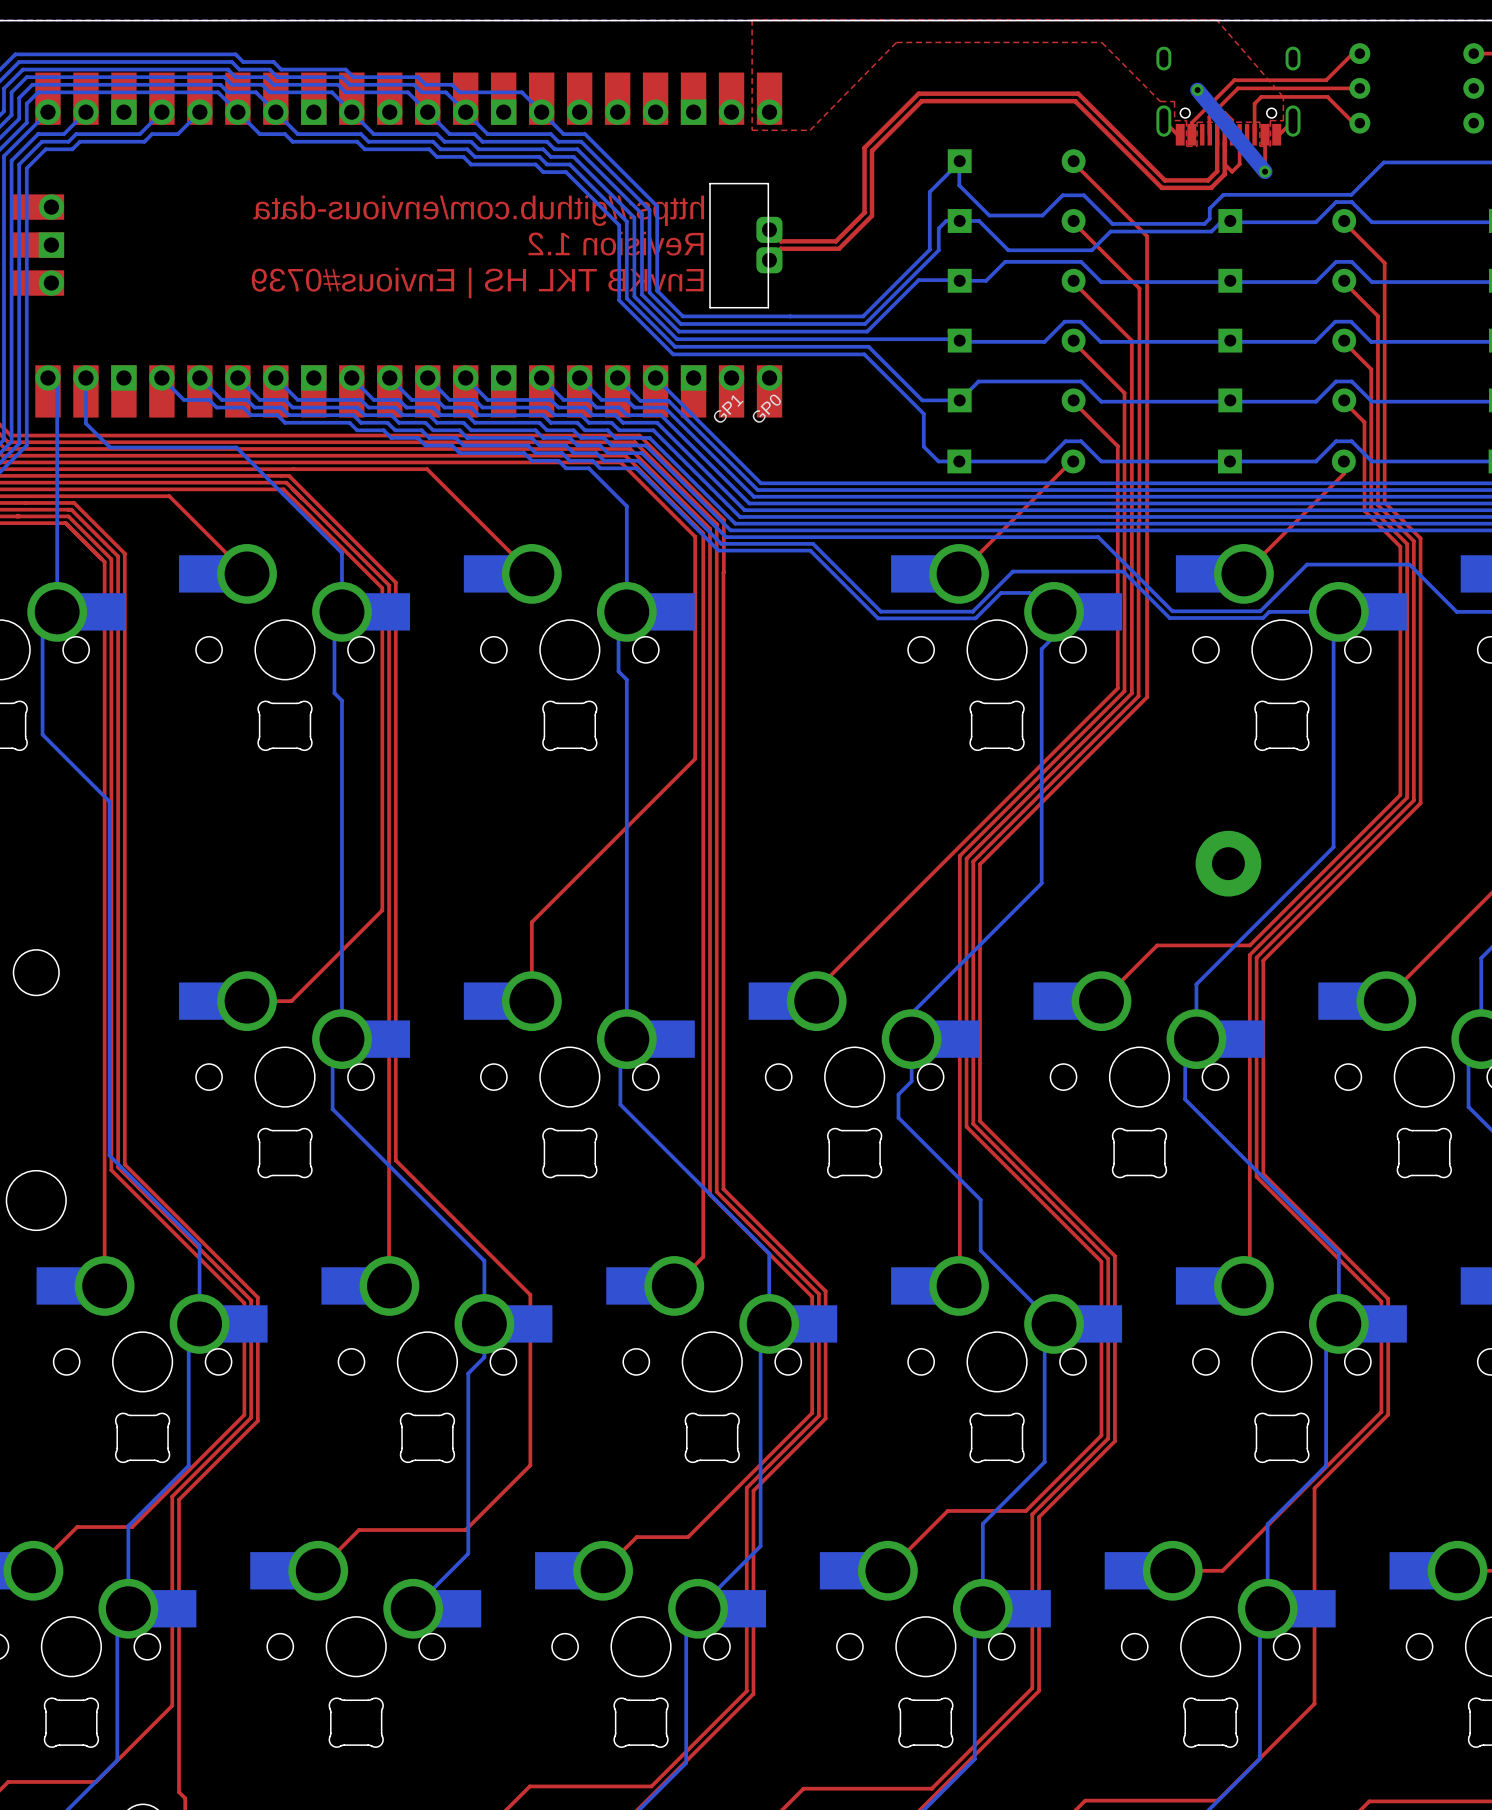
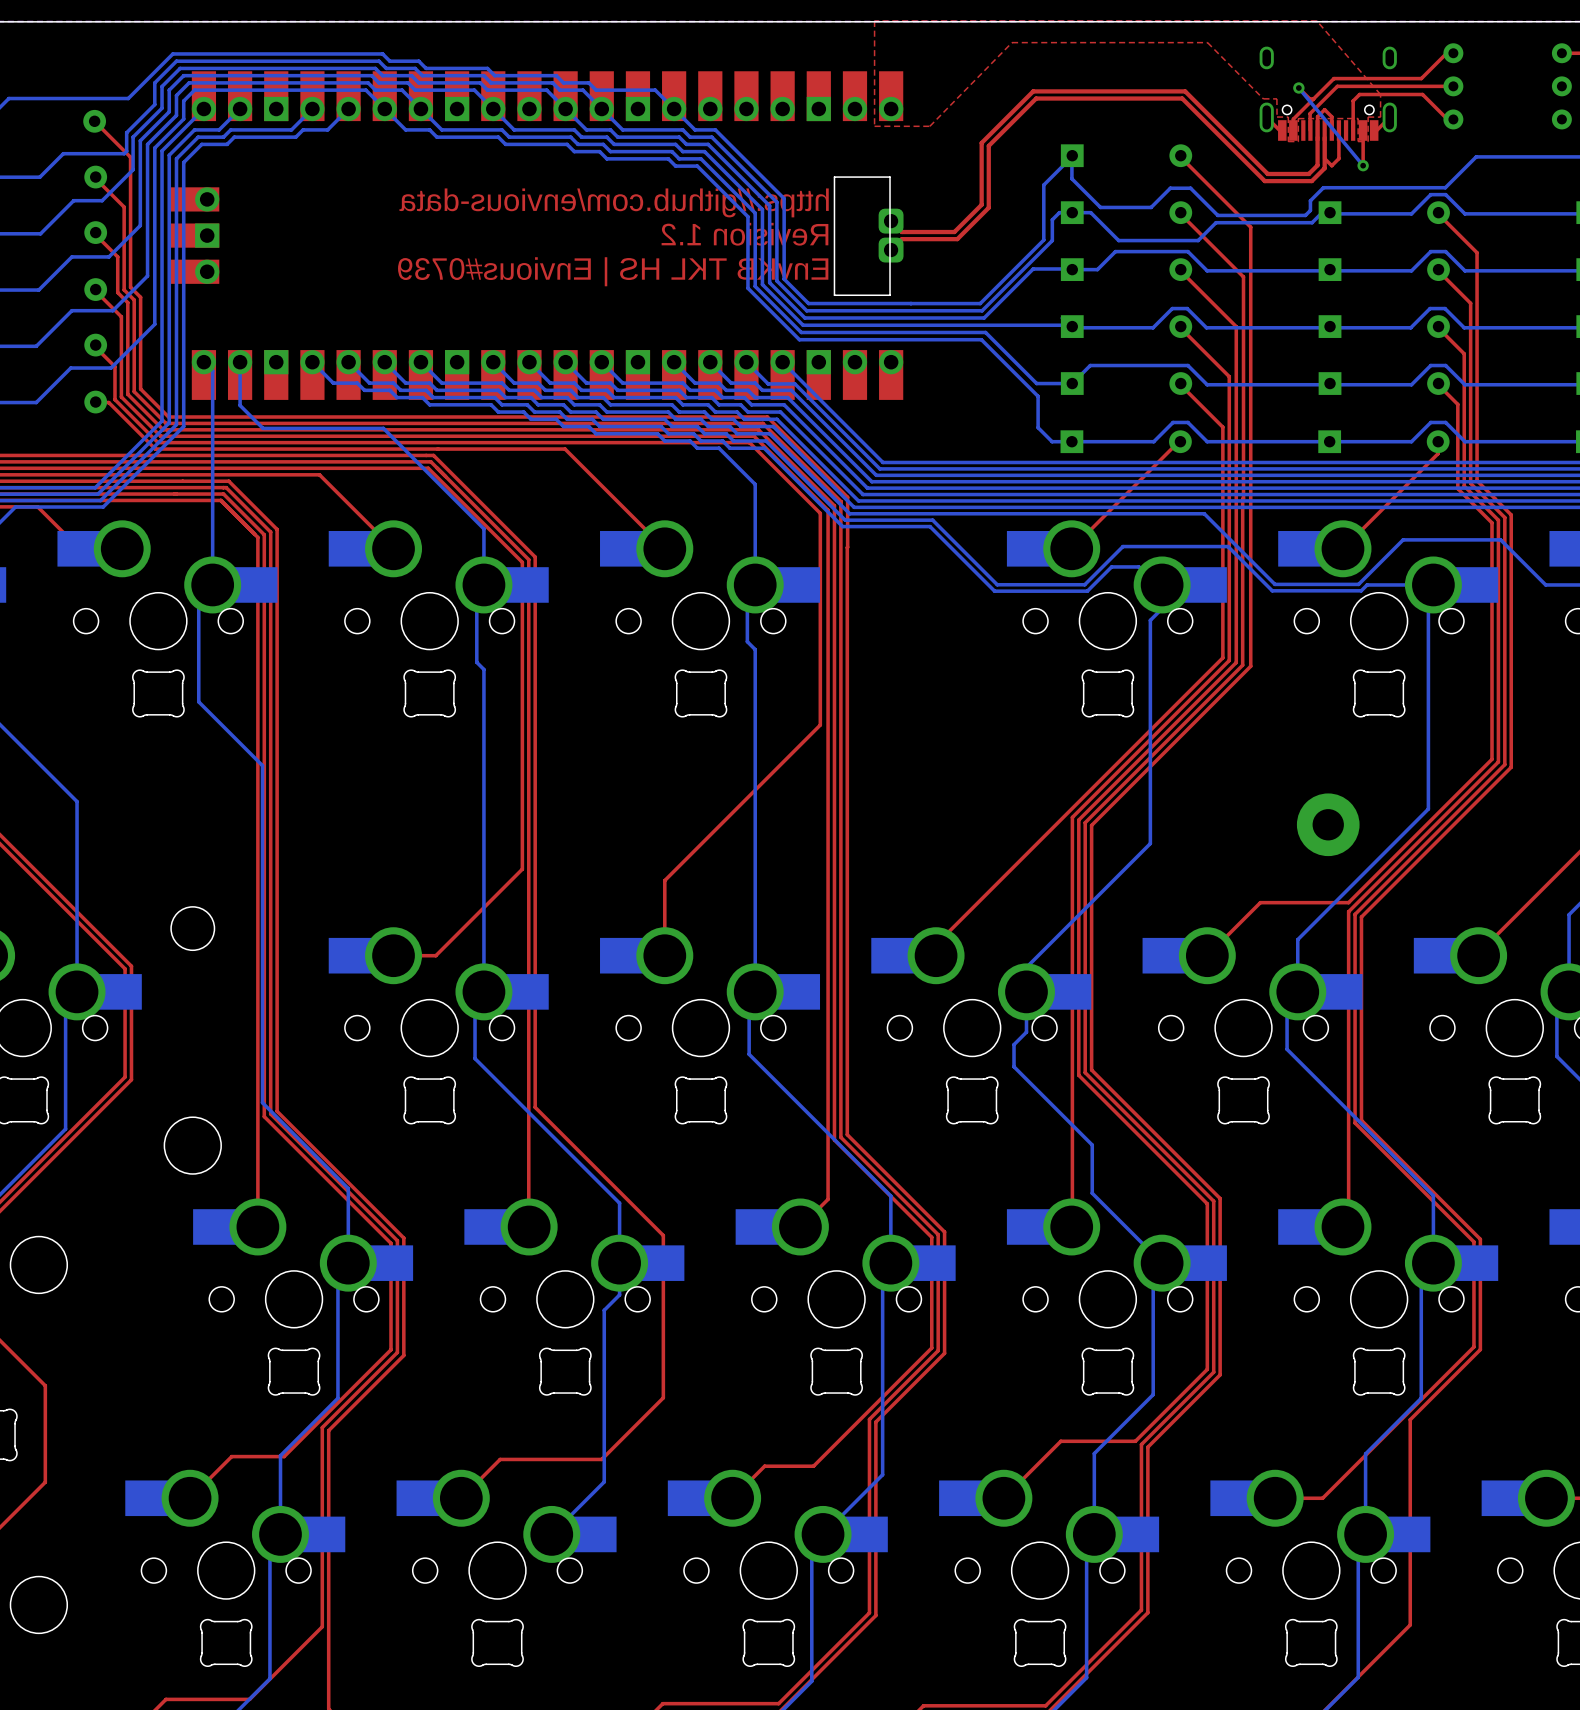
bottom track width: thick (1197, 90) (1265, 171) -> thin (1298, 87) (1363, 165)
text: GP0 (766, 408) -> none
text: GP1 (728, 409) -> none

